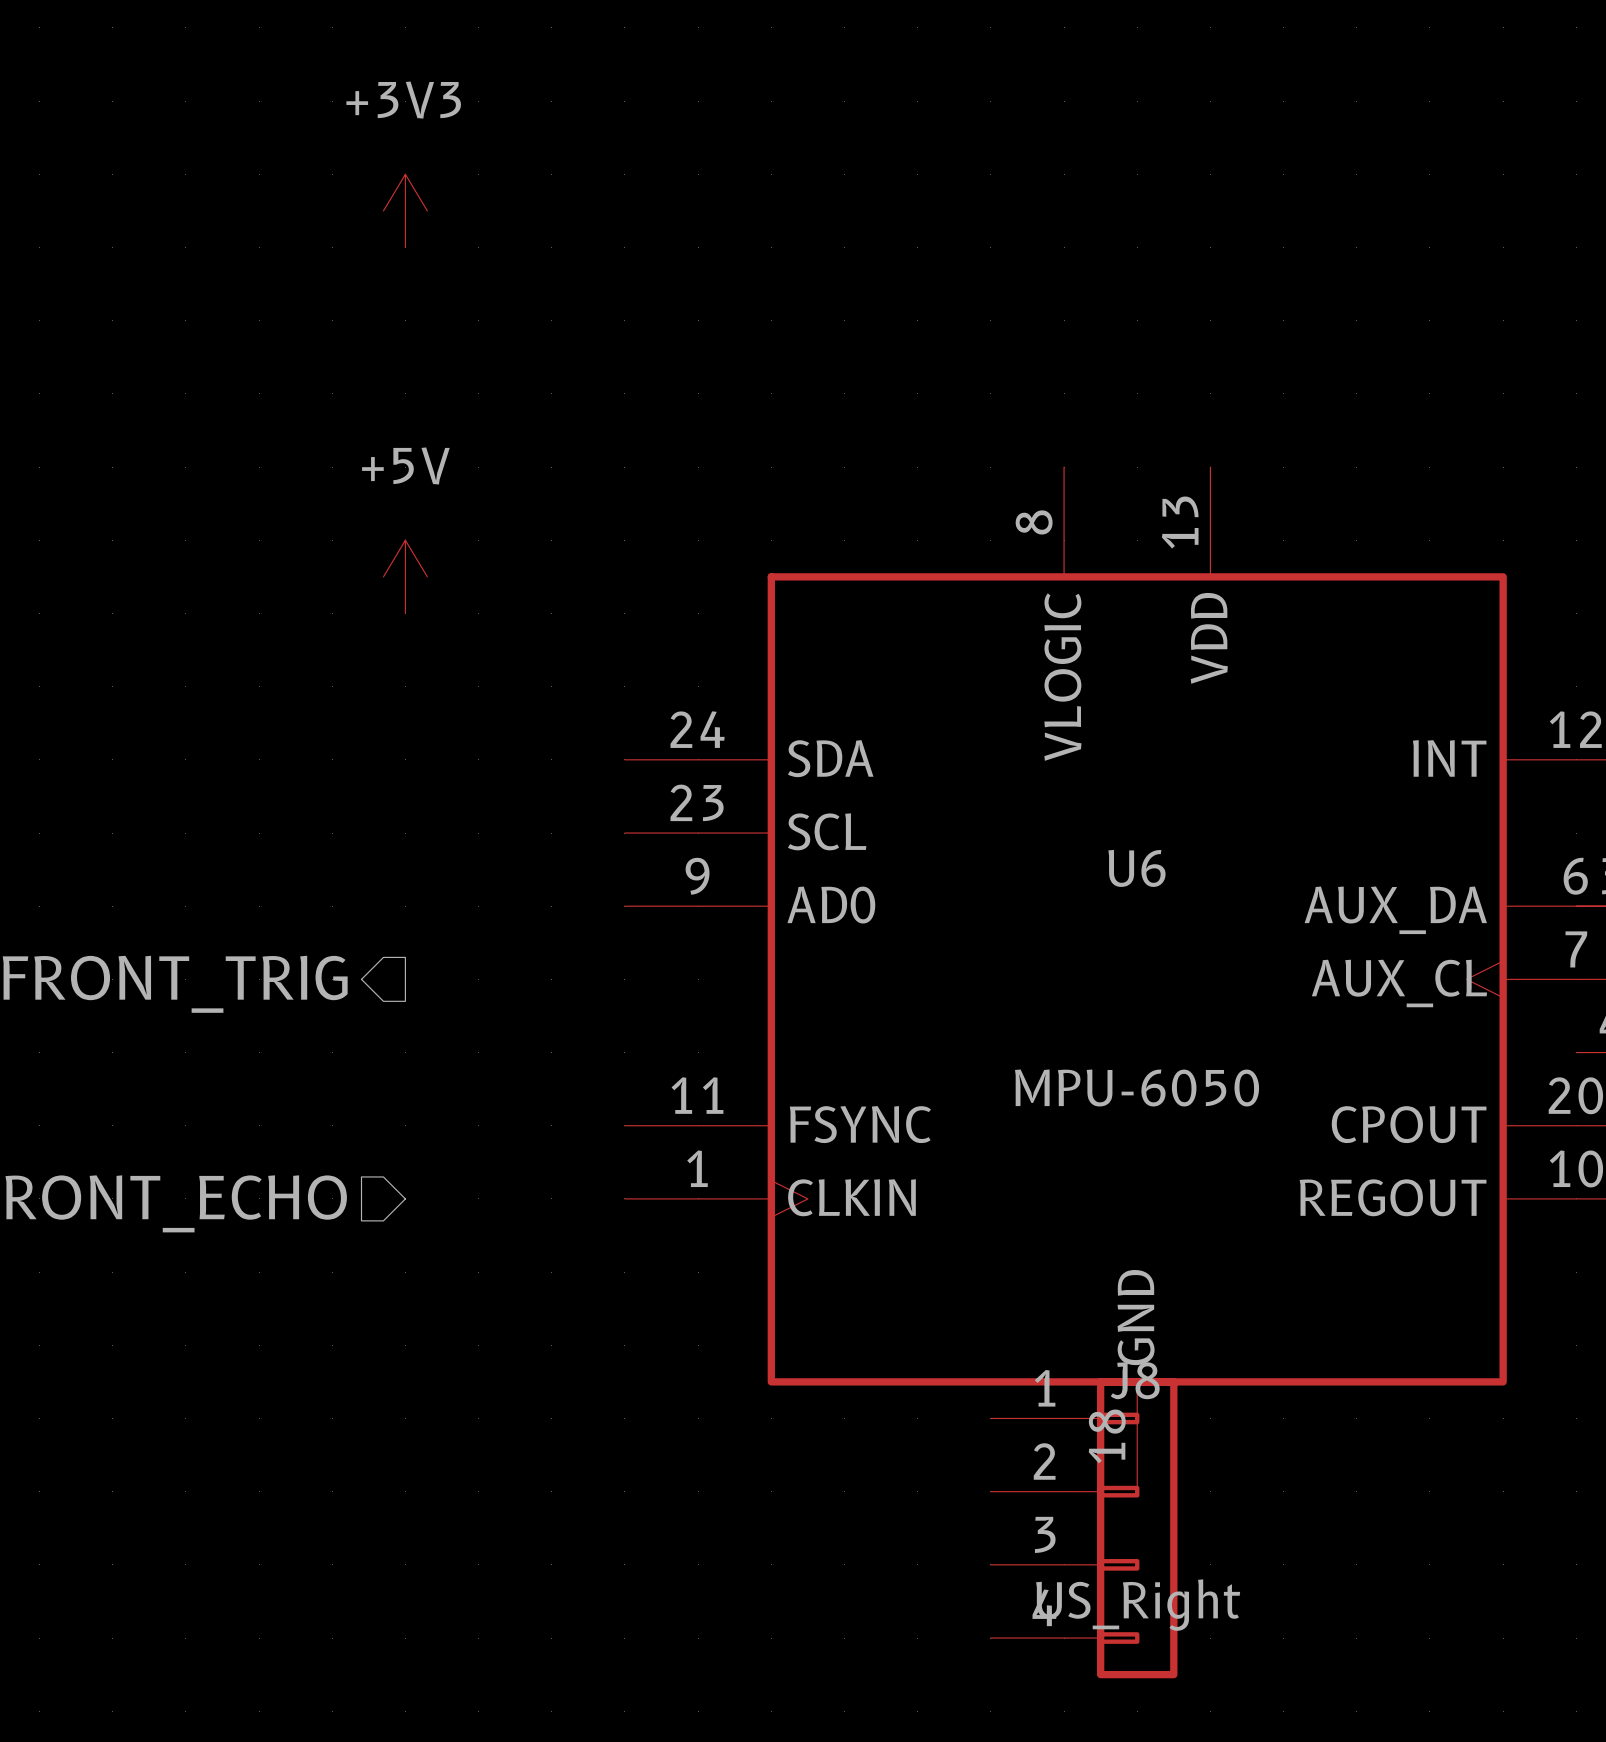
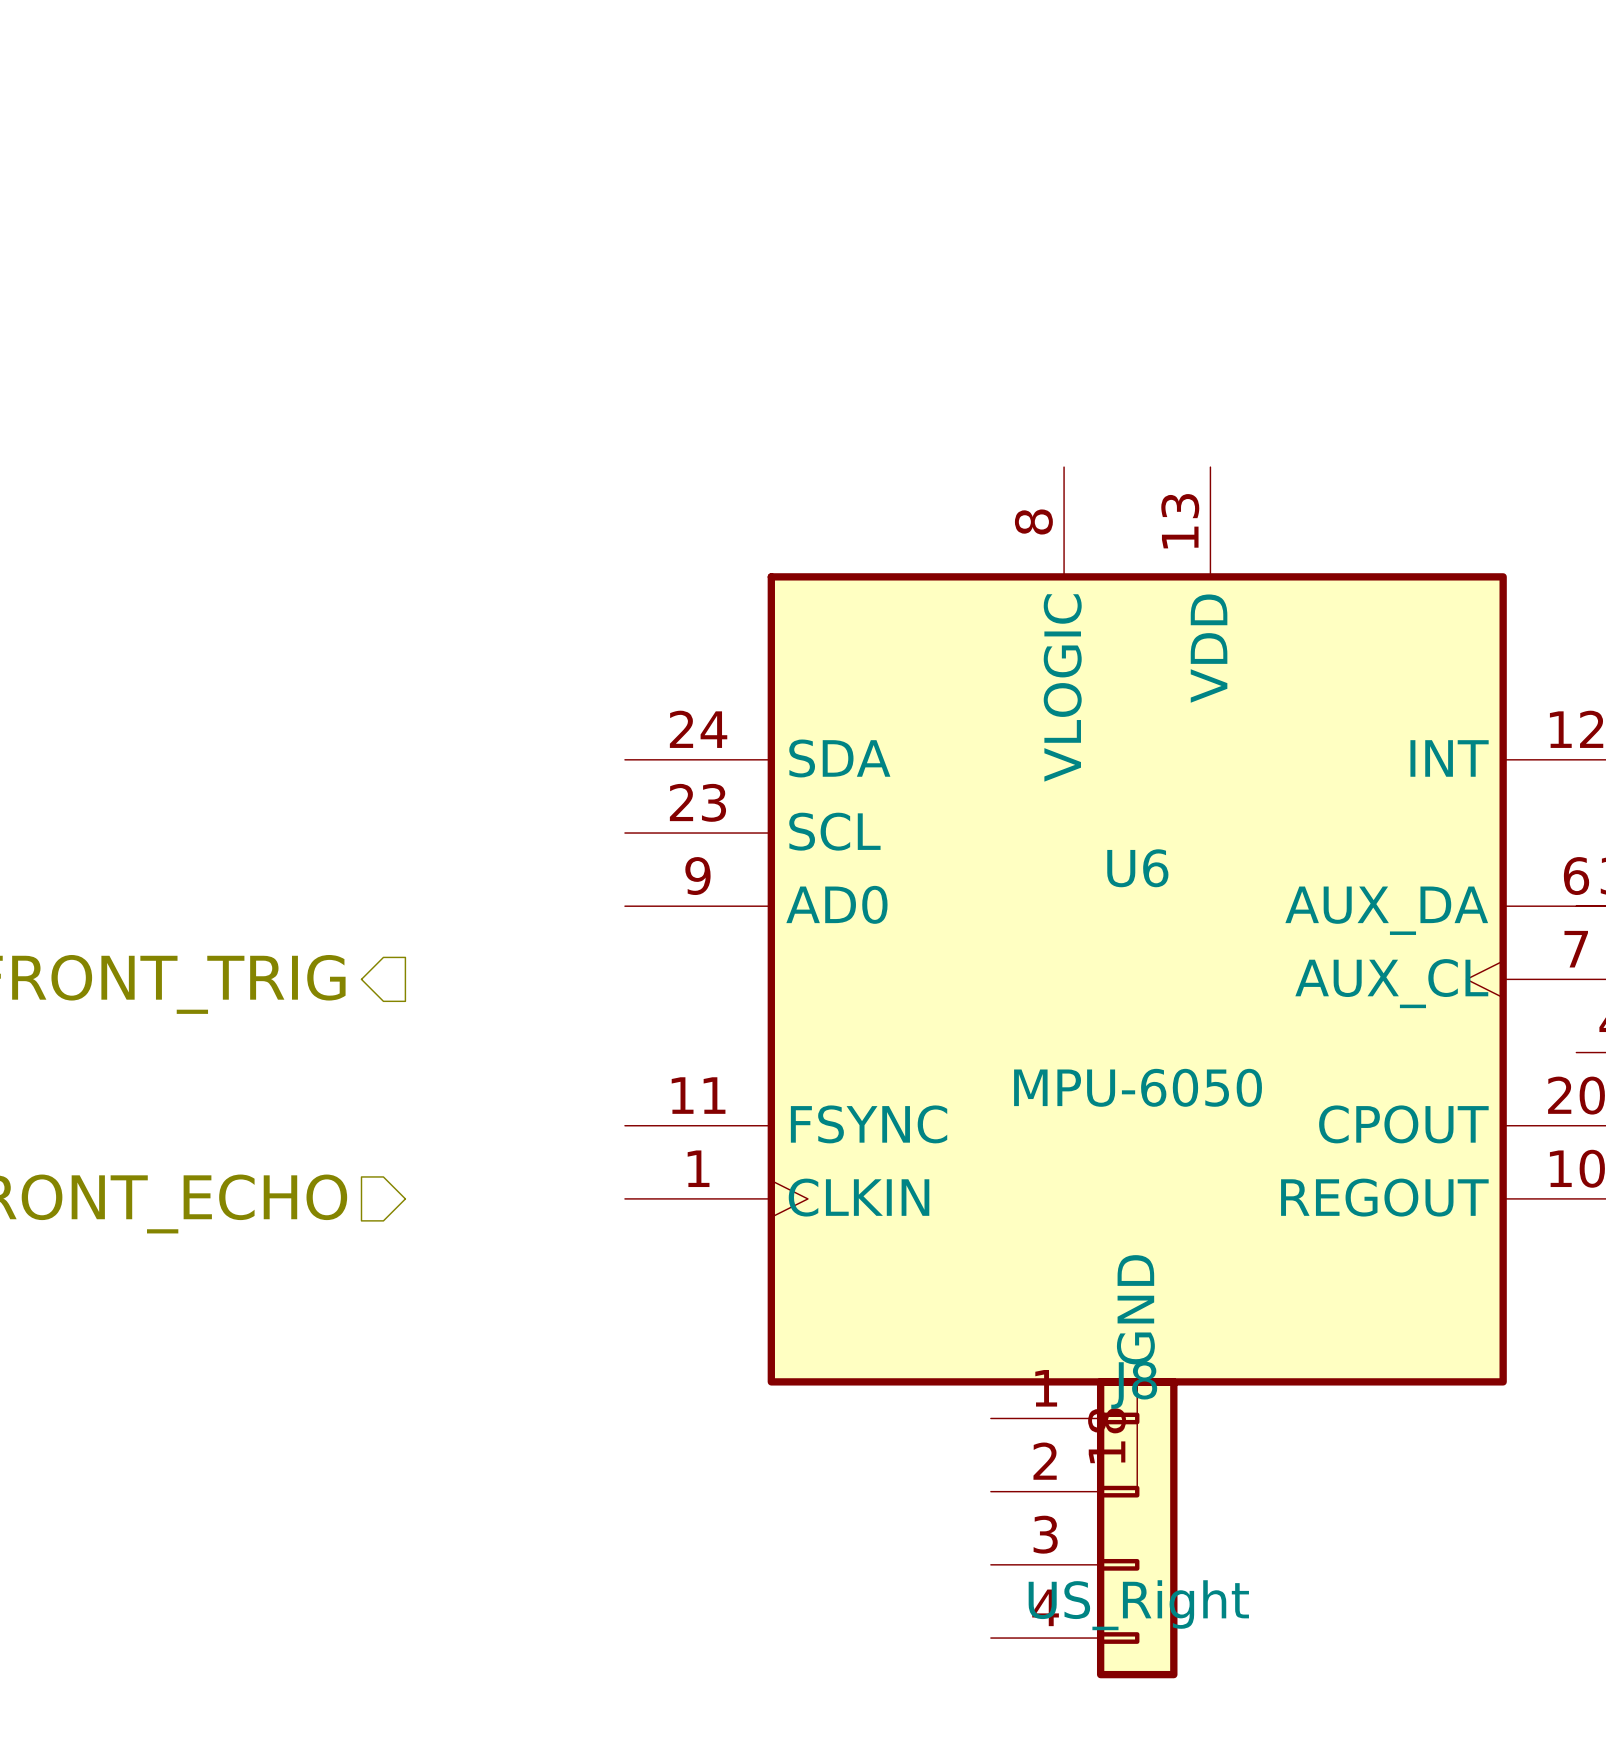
power symbol: +3V3 (405, 210) -> none
power symbol: +5V (405, 576) -> none

